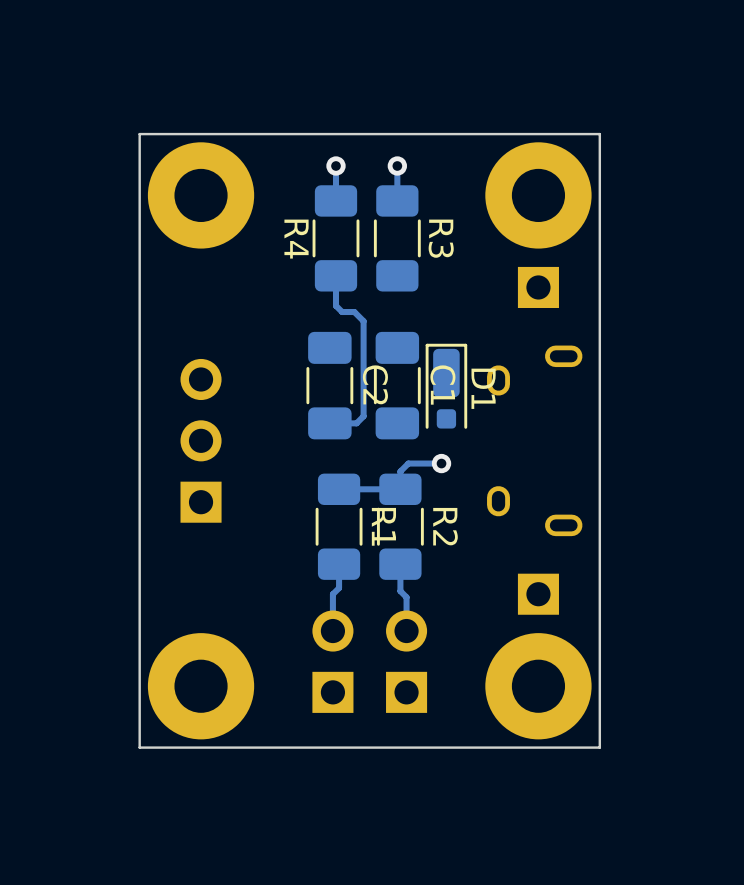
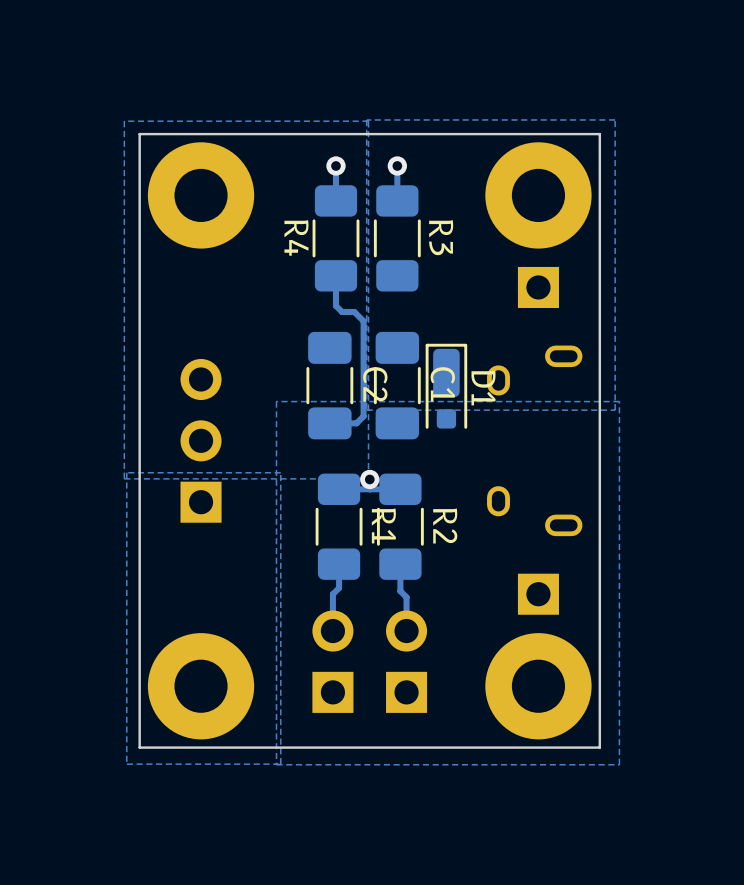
zone outline: none -> (615, 119) (615, 410) (366, 410) (366, 119) (615, 119)
zone outline: none -> (368, 121) (368, 478) (124, 478) (124, 121) (368, 121)
zone outline: none -> (619, 401) (619, 764) (276, 764) (276, 401) (619, 401)
track: (441, 463) (408, 463) (400, 471) (400, 489) -> none
via position: (441, 463) -> (369, 479)
zone outline: none -> (280, 472) (280, 764) (126, 764) (126, 472) (280, 472)

